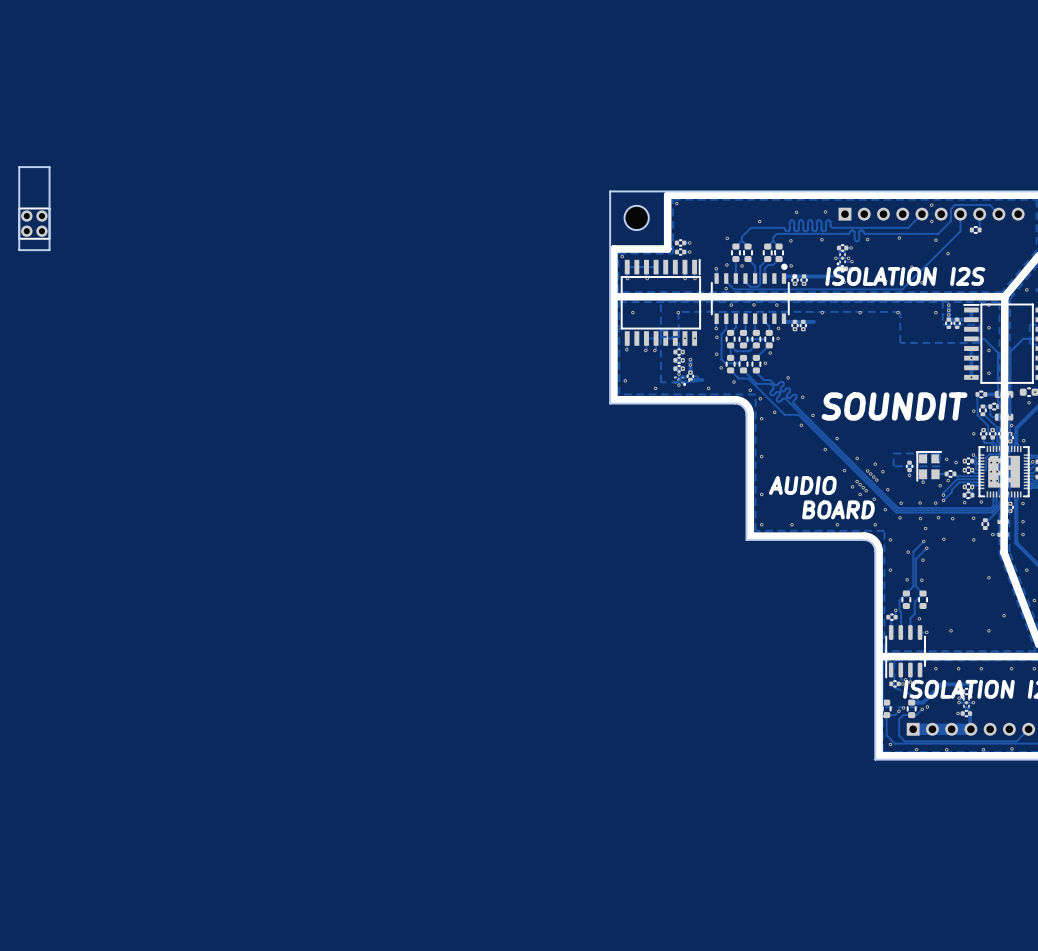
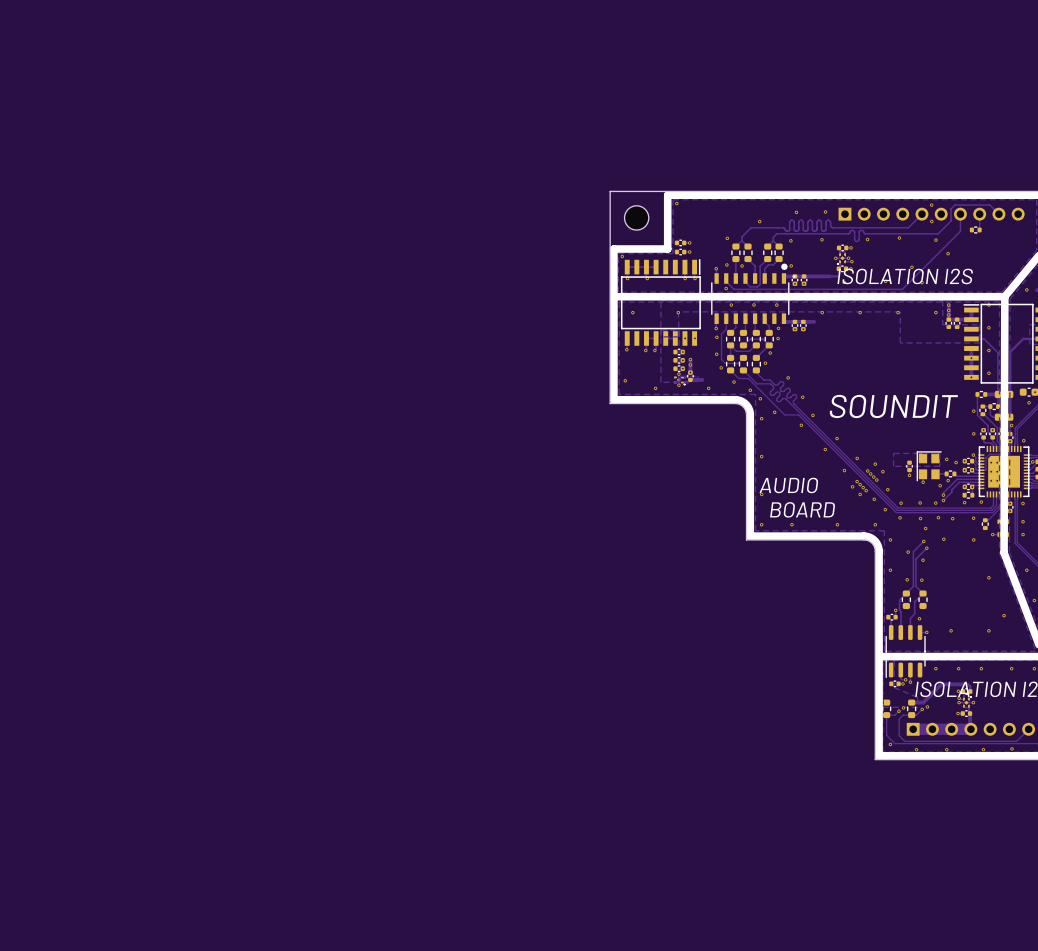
board edge: (19, 167) (49, 167) (49, 250) (19, 250) (19, 167) -> none
part: (34, 223) -> none

